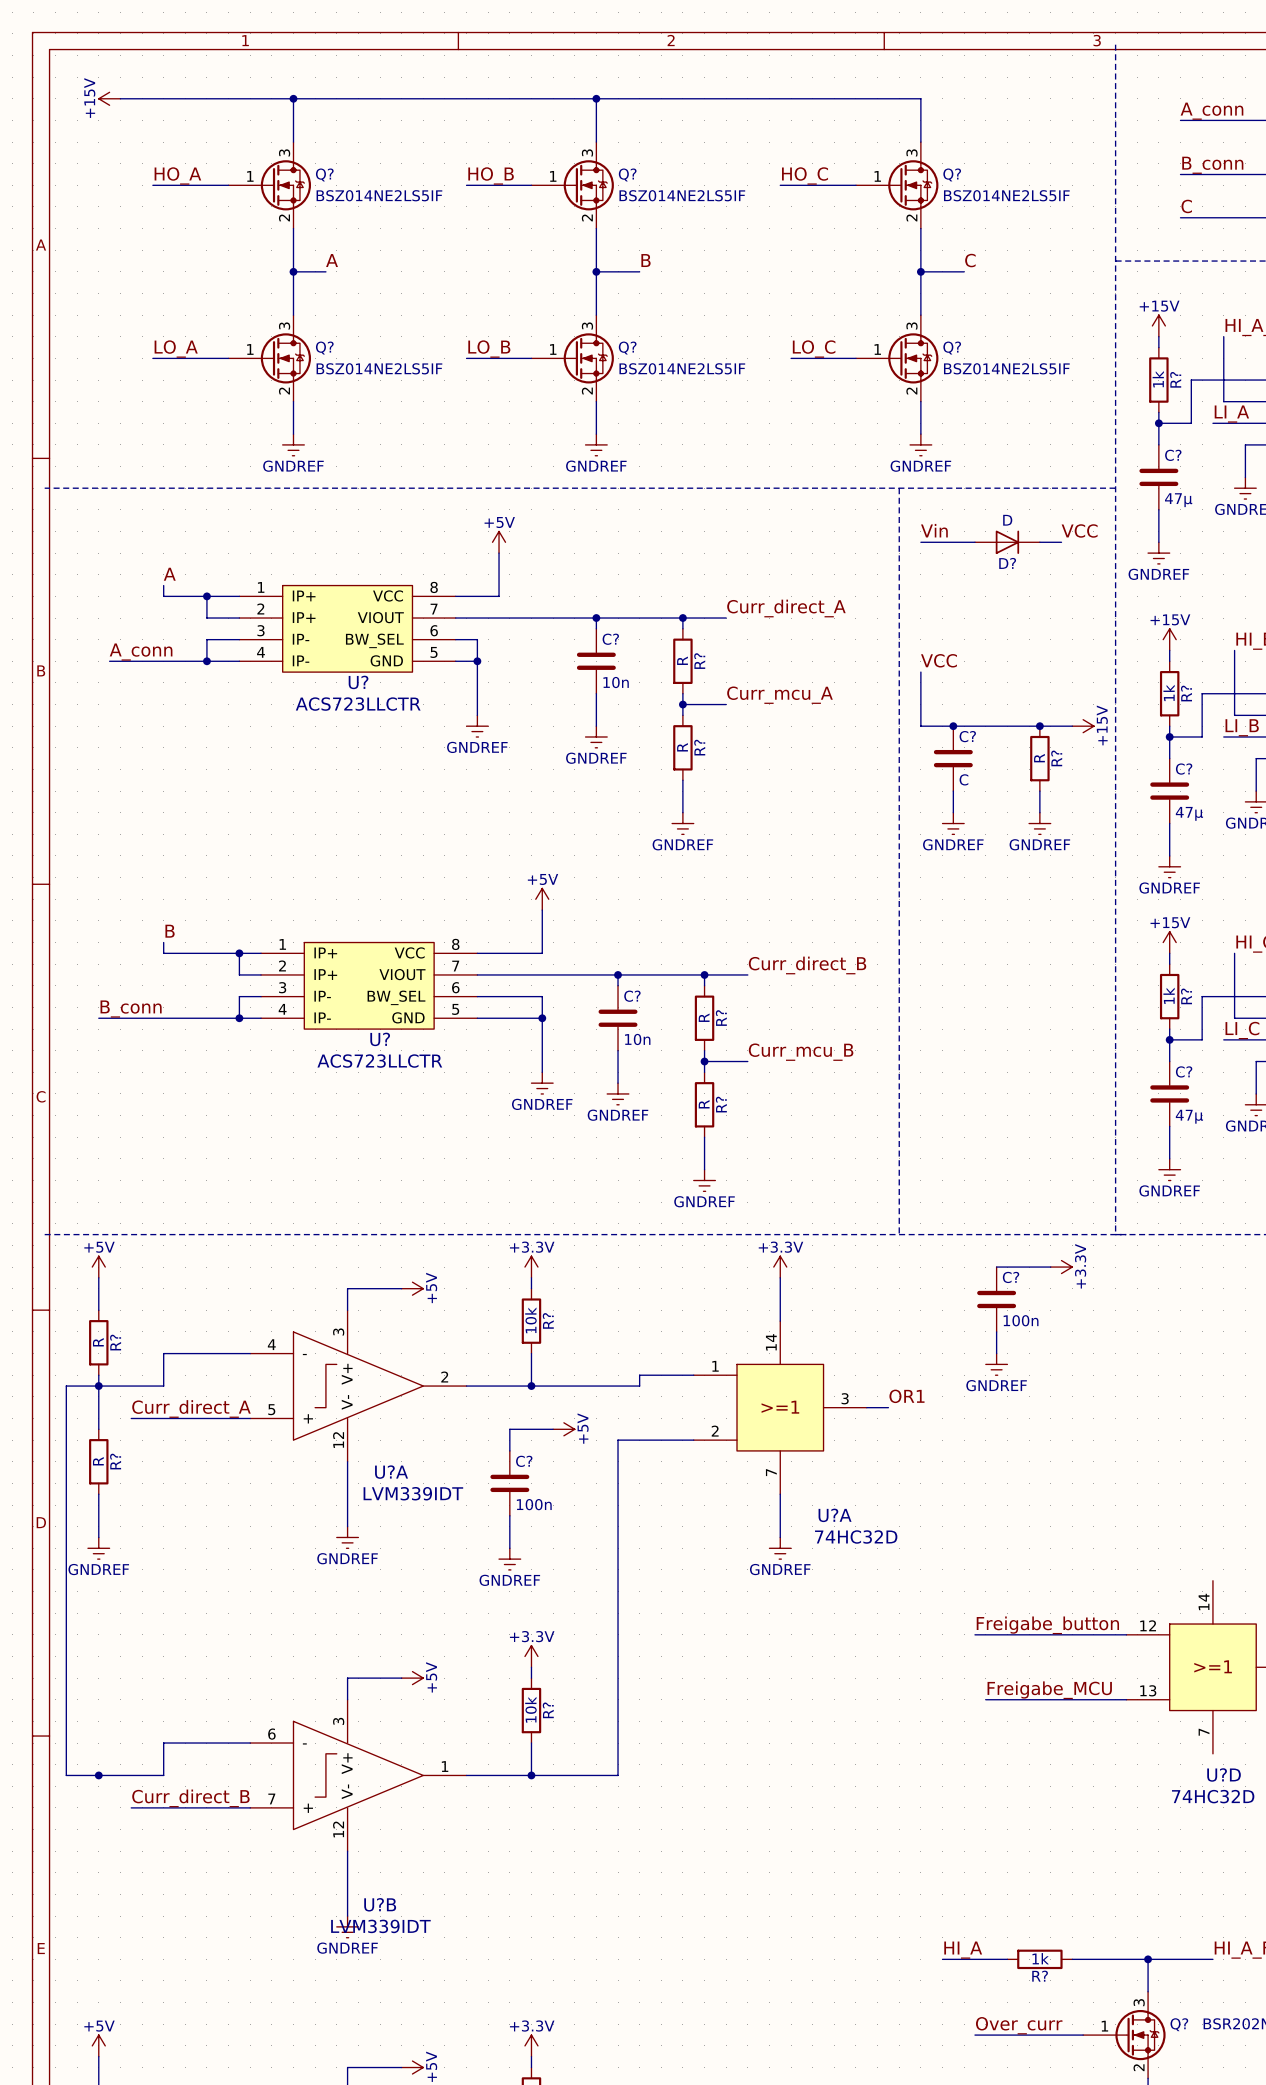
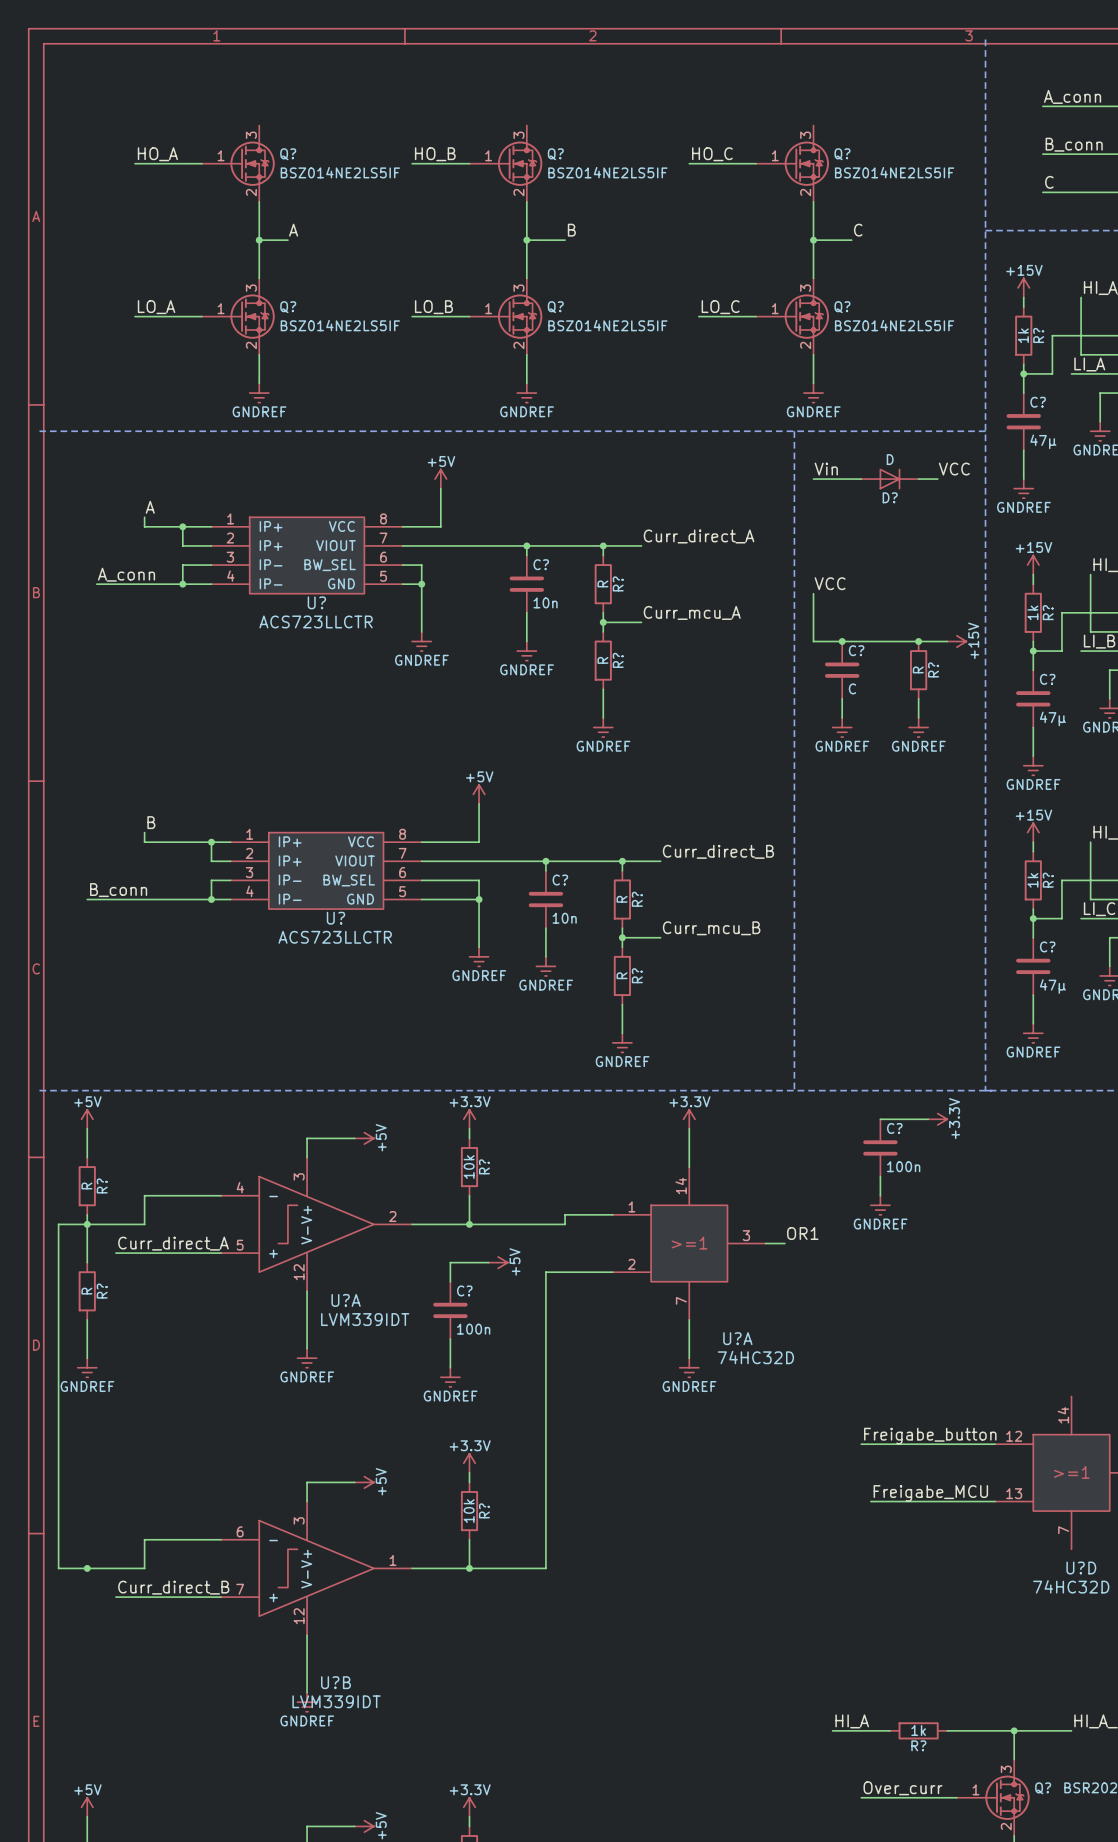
power symbol: +15V (109, 98) -> none
wire: (120, 98) (920, 98) (920, 142) -> none
wire: (293, 98) (293, 142) -> none
junction: (293, 98) -> none
wire: (596, 98) (596, 142) -> none
junction: (596, 98) -> none

